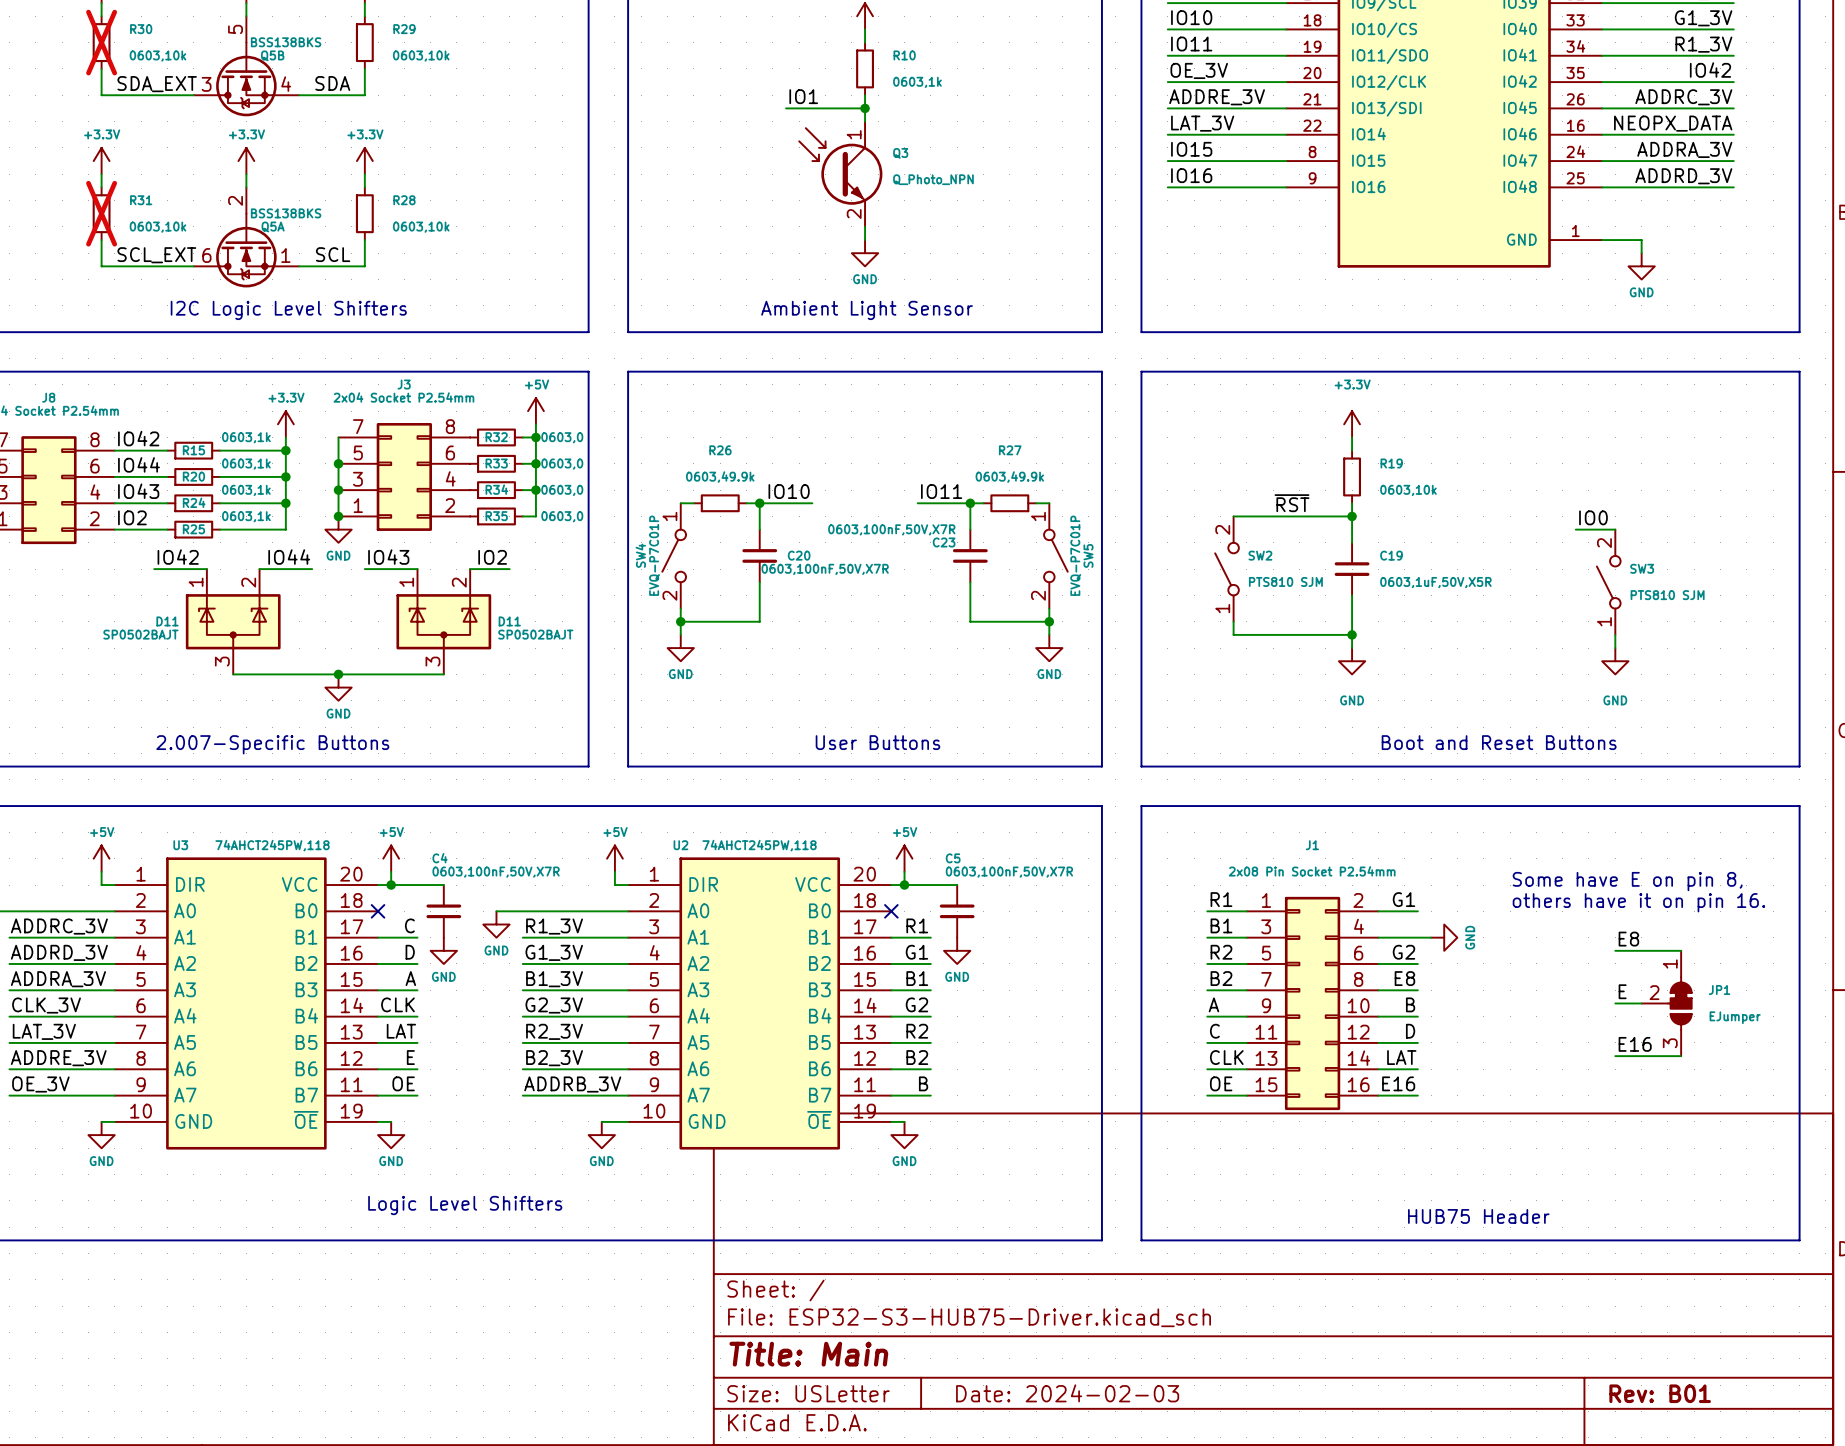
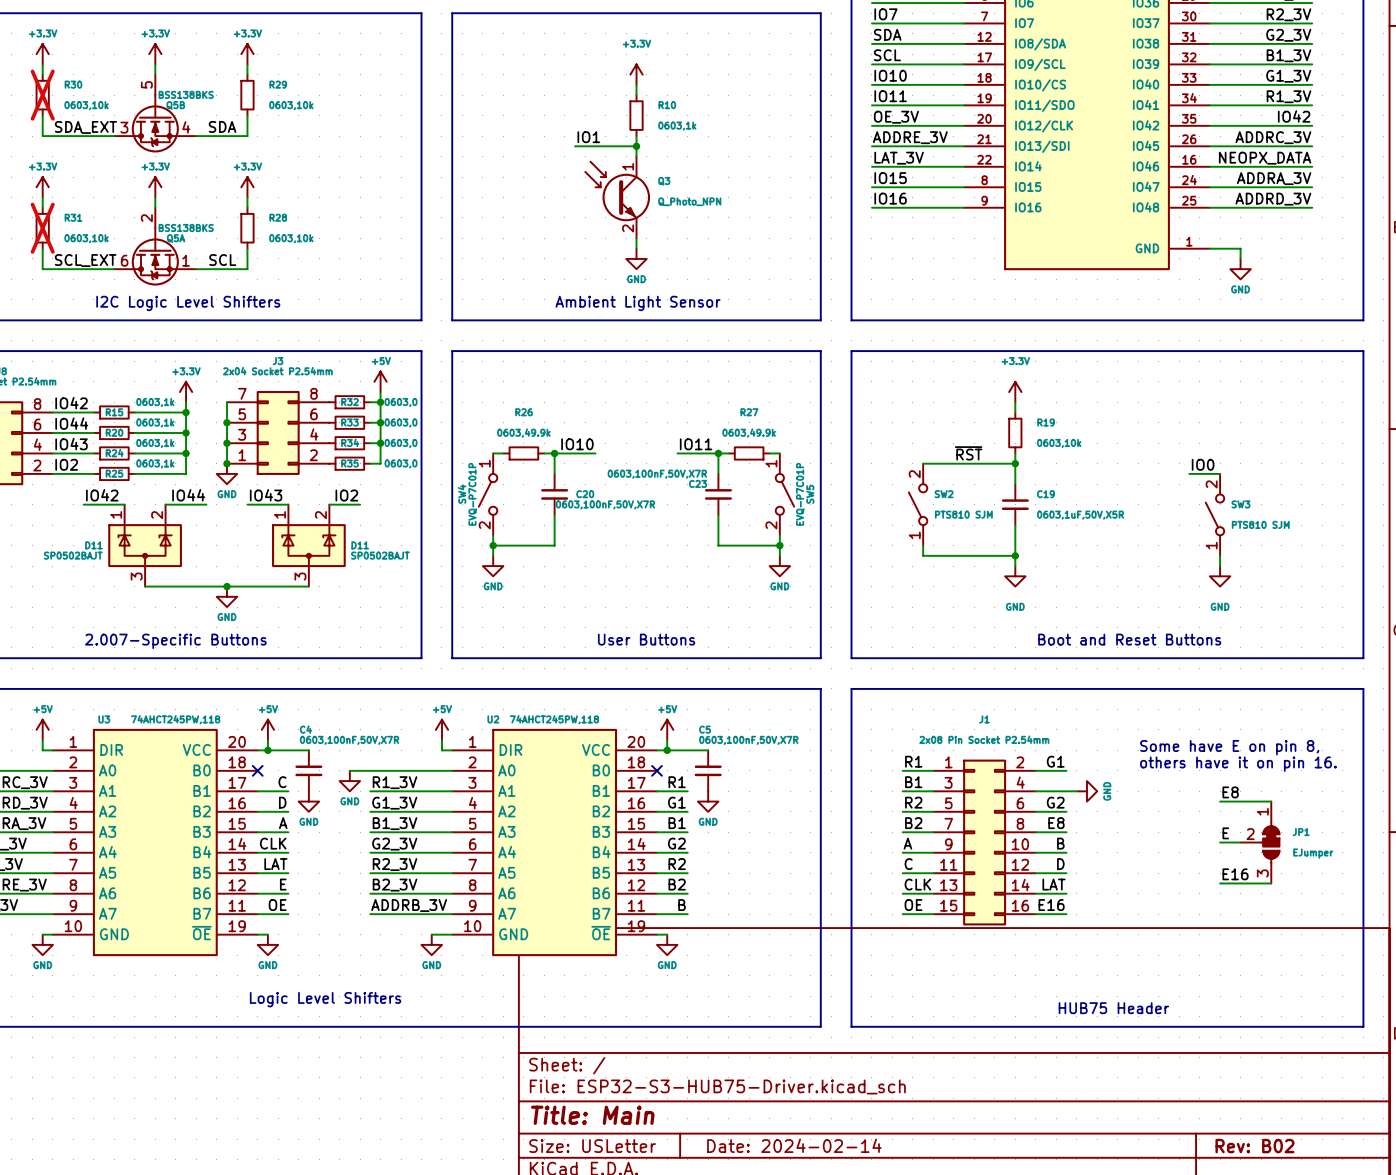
title block: Date: 2024-02-03 (1067, 1393) -> Date: 2024-02-14 (794, 1145)
title block: Rev: B01 (1660, 1393) -> Rev: B02 (1254, 1146)

